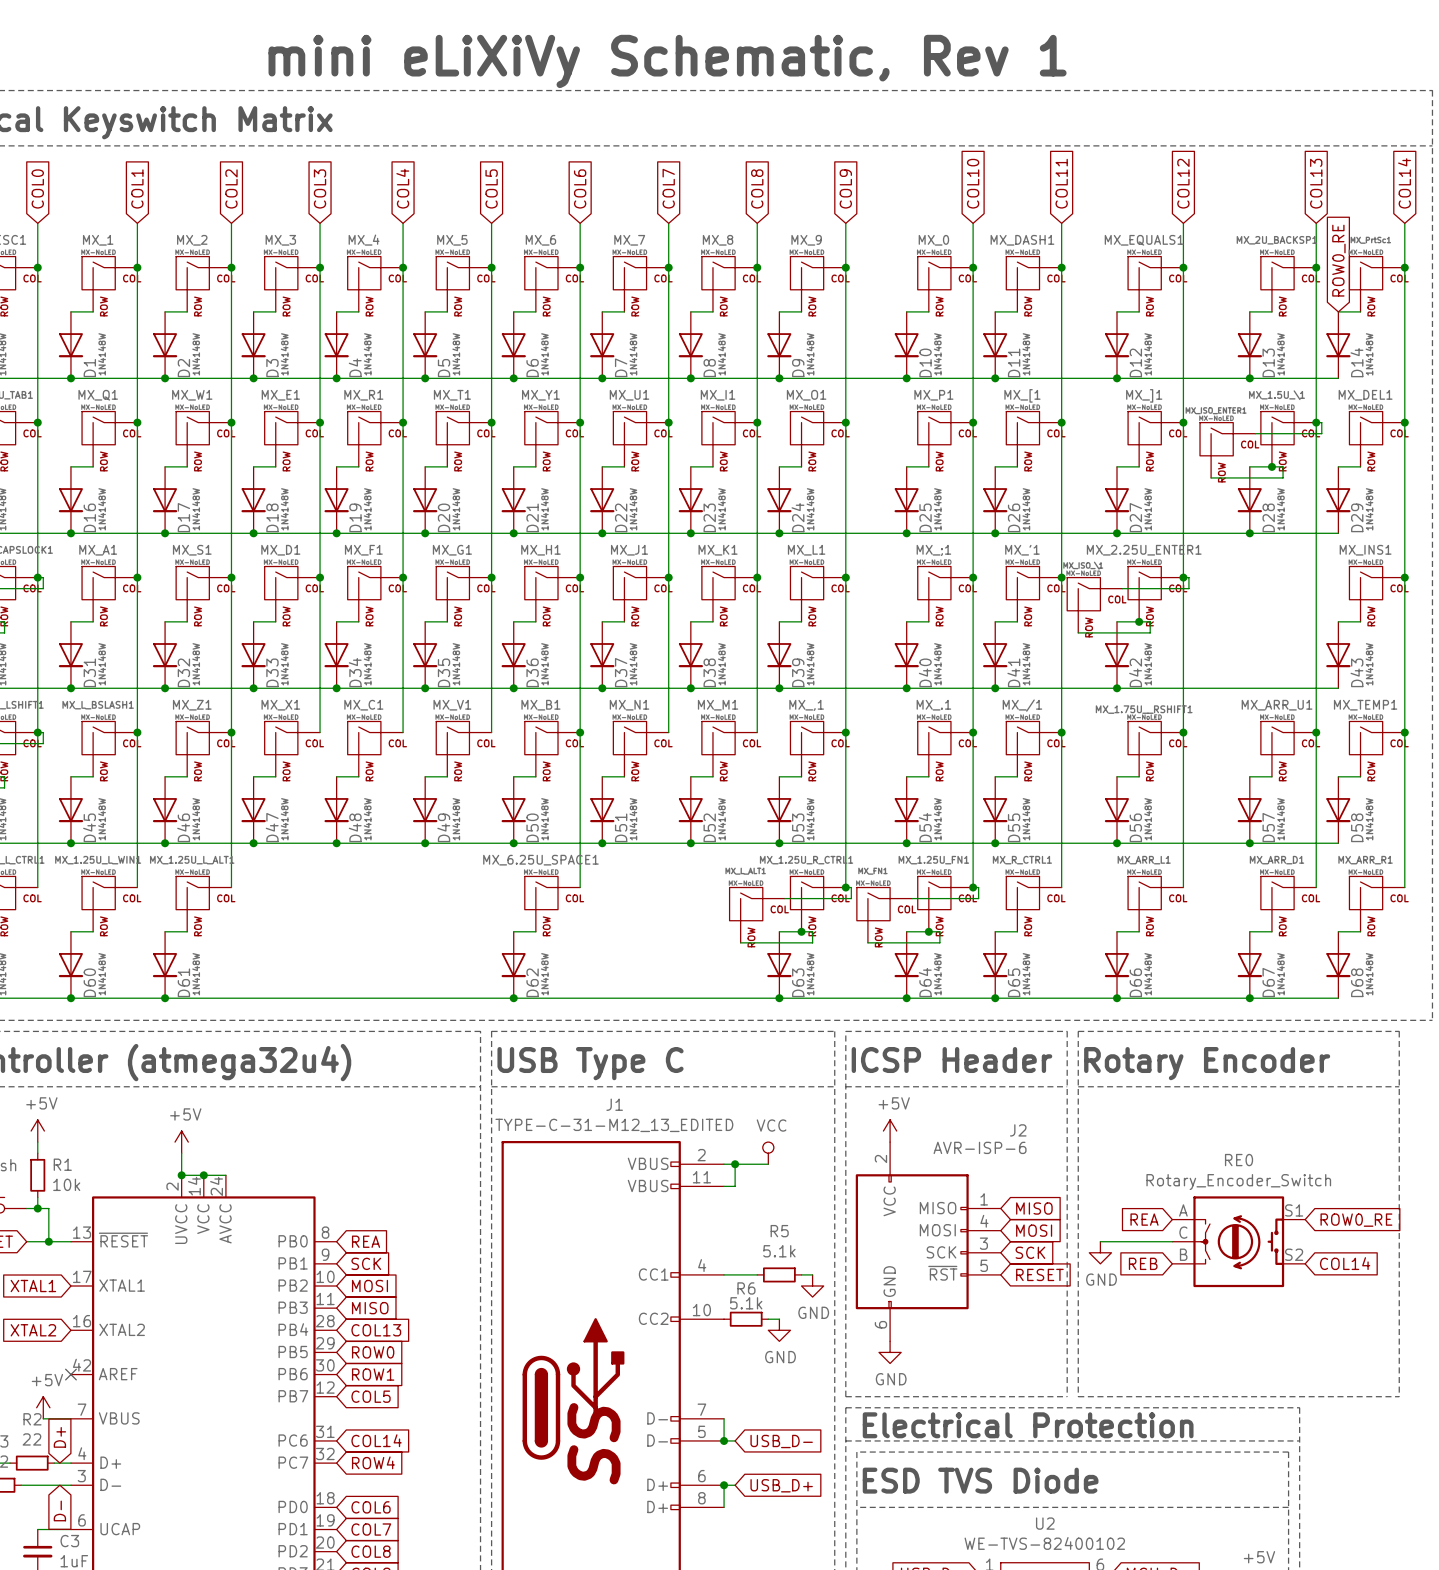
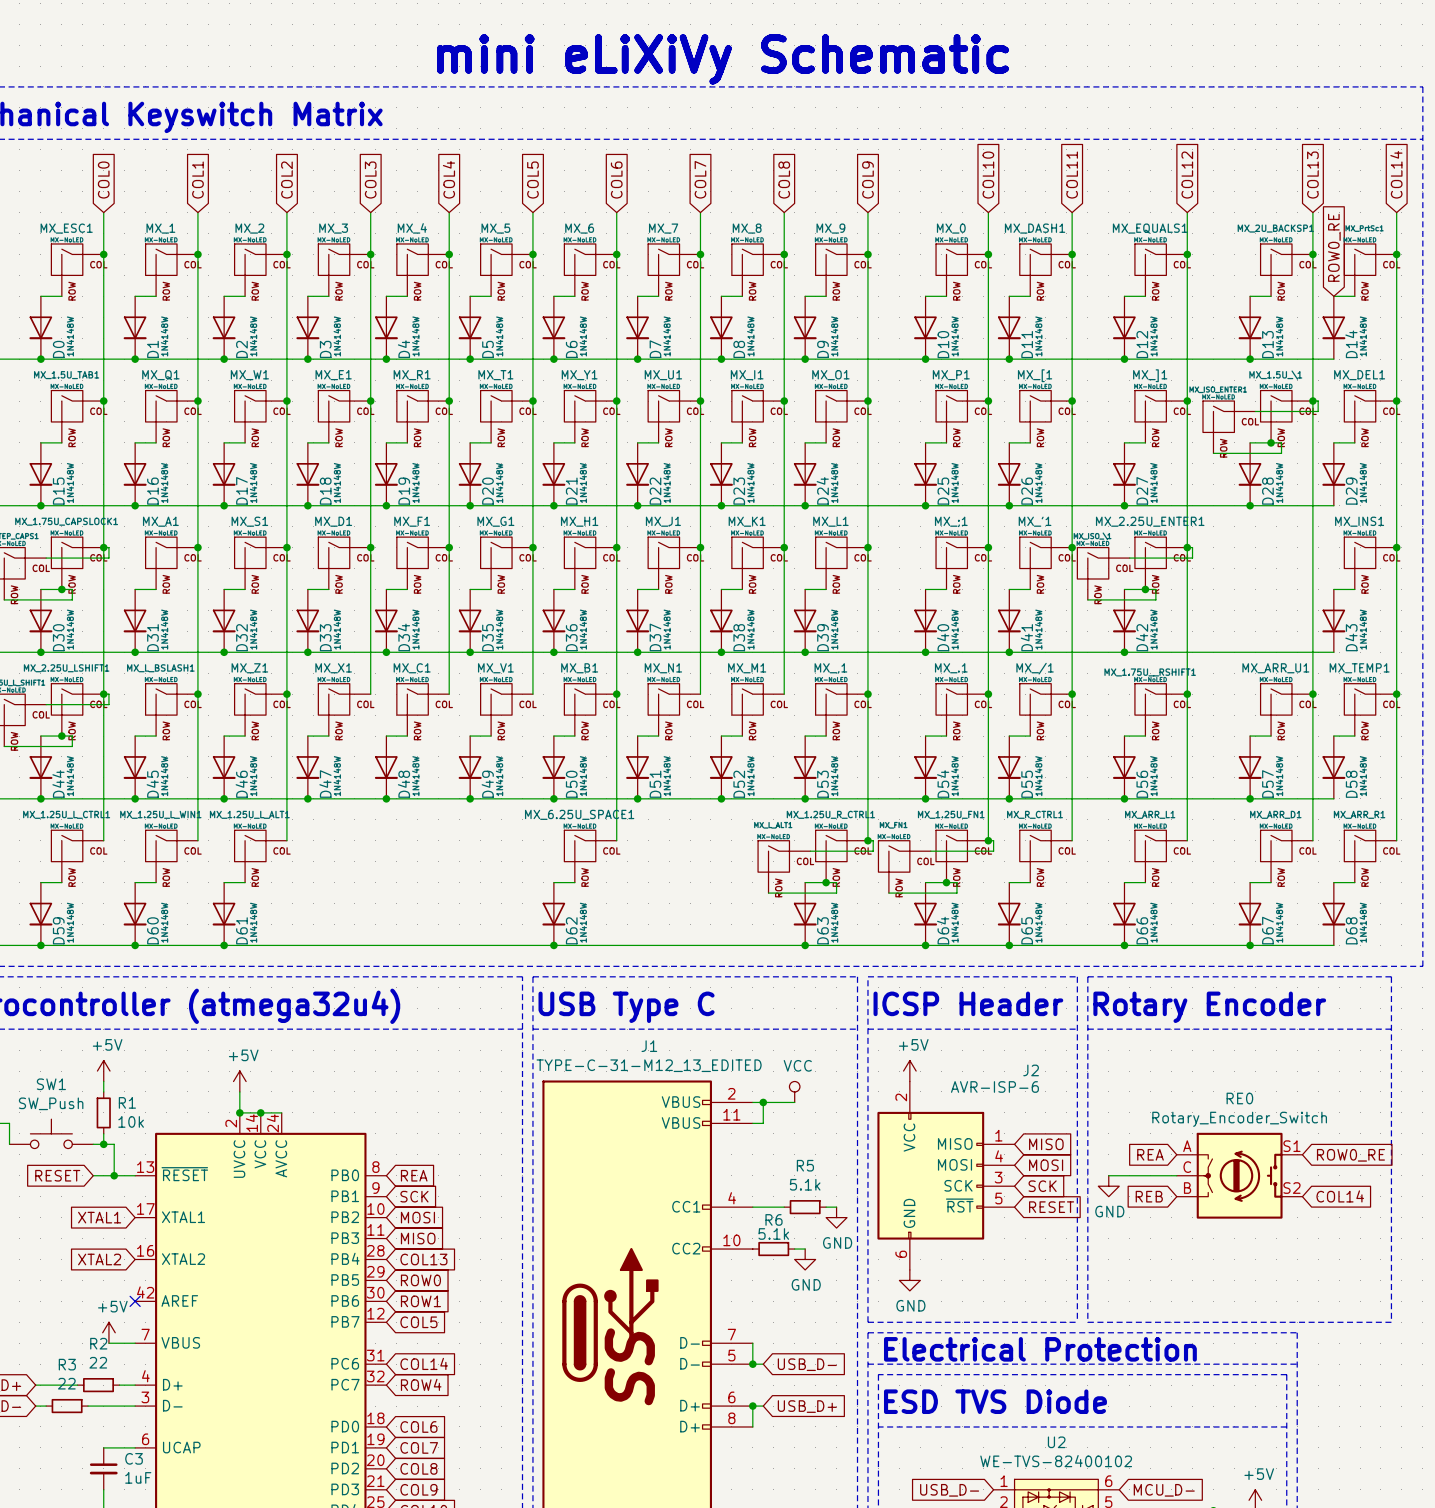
text: mini eLiXiVy Schematic, Rev 1 (667, 61) -> mini eLiXiVy Schematic (722, 59)
global label: D+ (59, 1437) -> none
global label: D- (59, 1510) -> none

